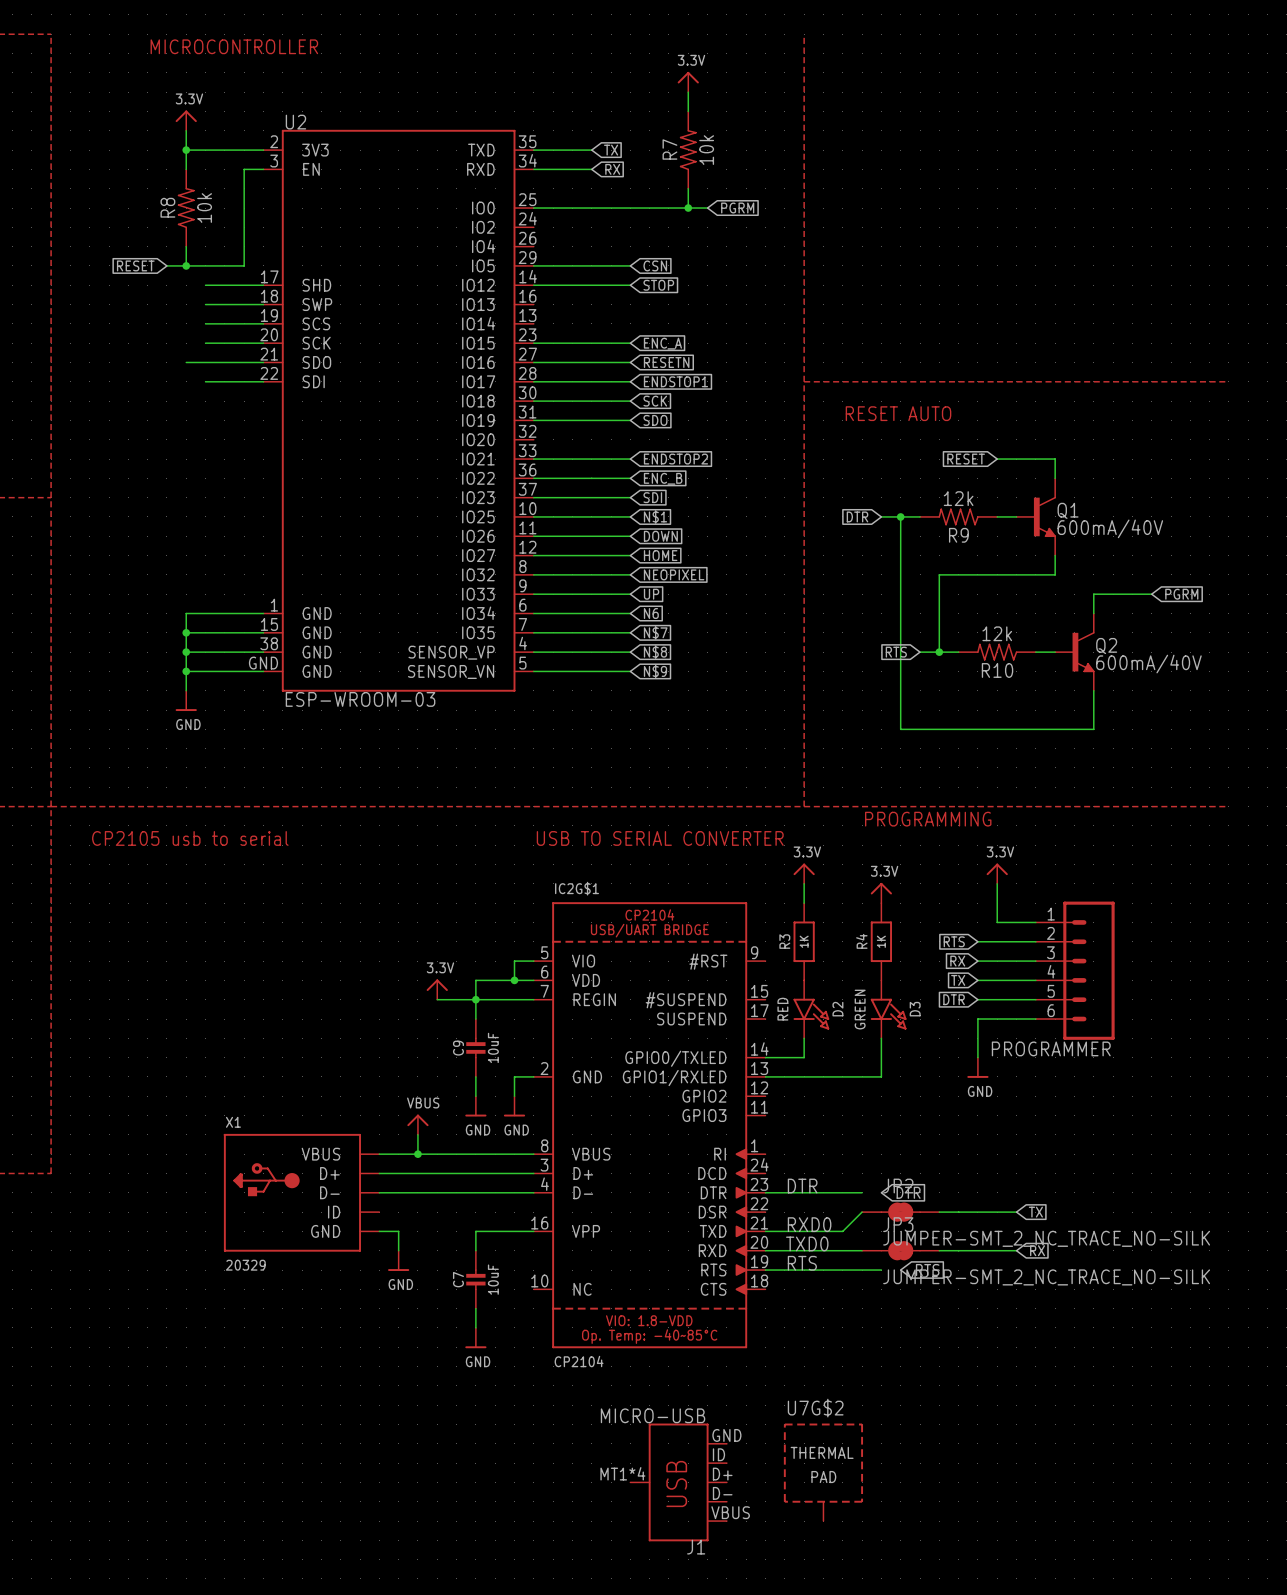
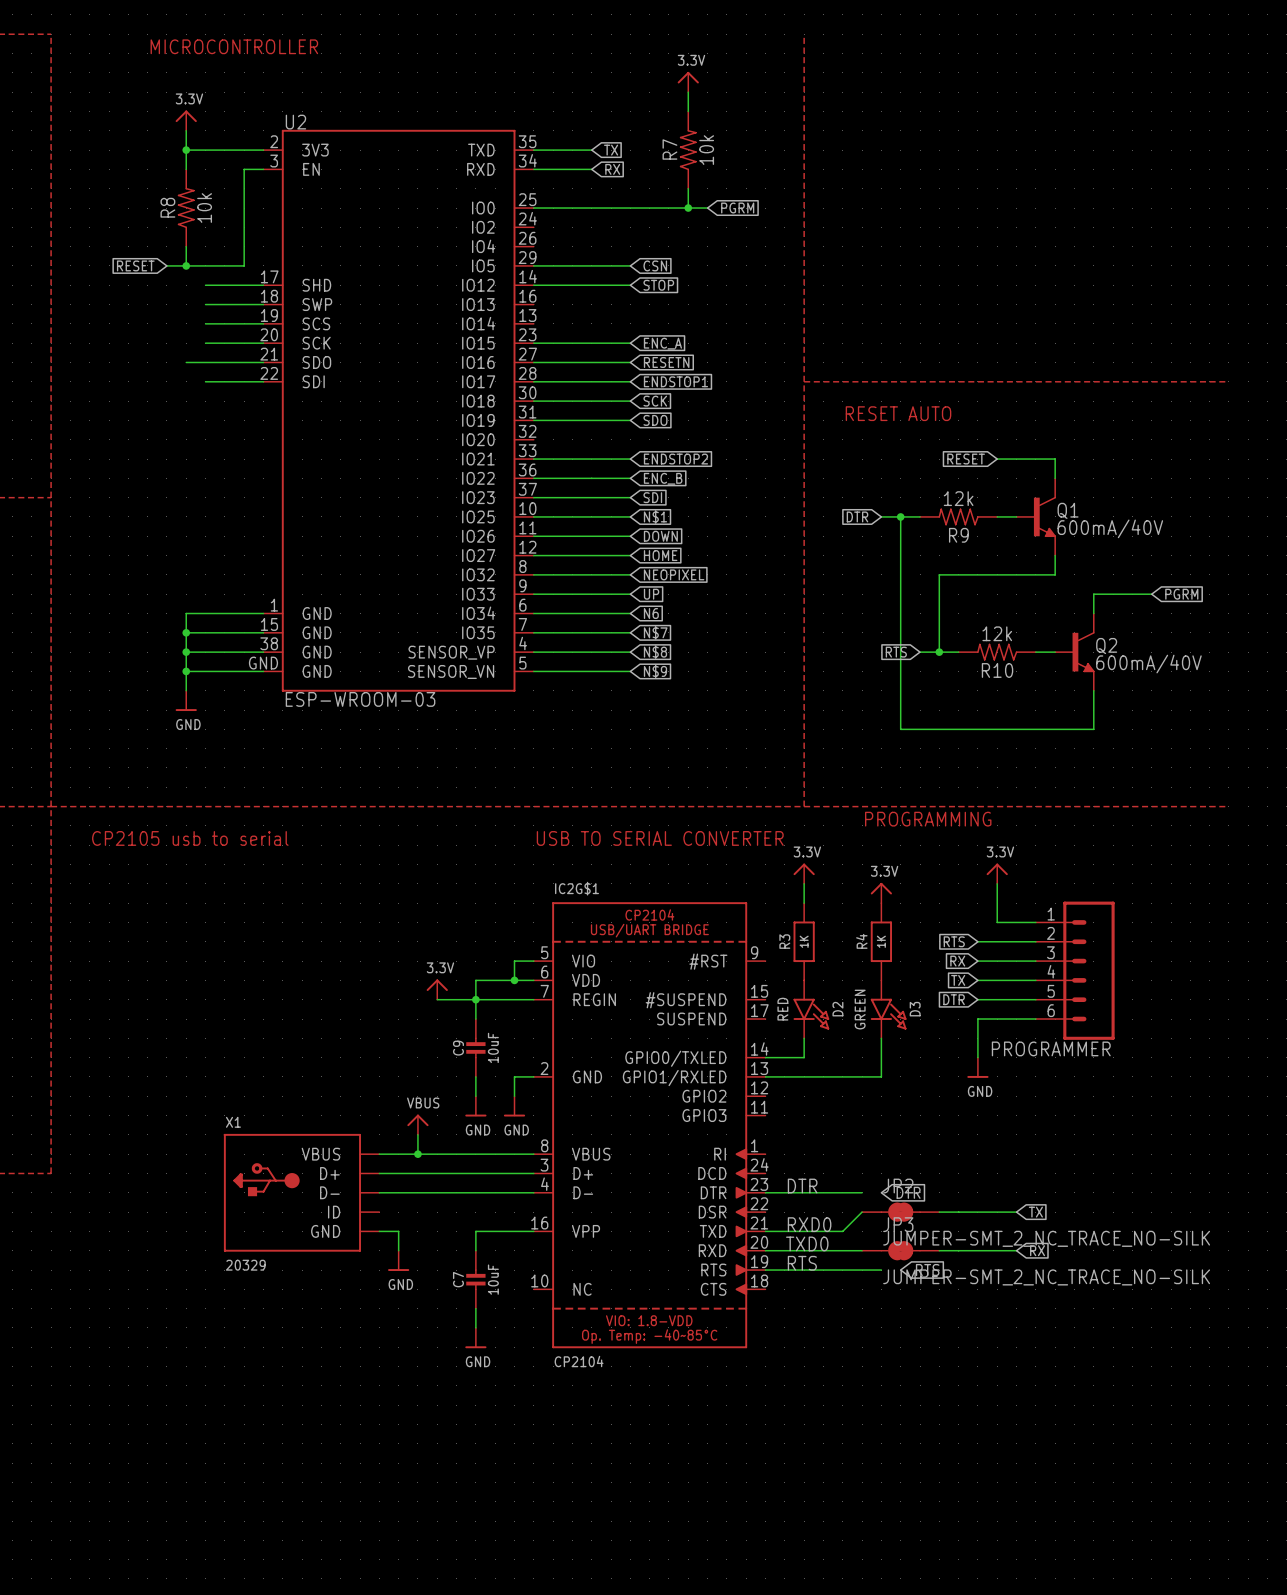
U7G$2: (823, 1472) -> none
J1: MICRO-USB (678, 1482) -> none

